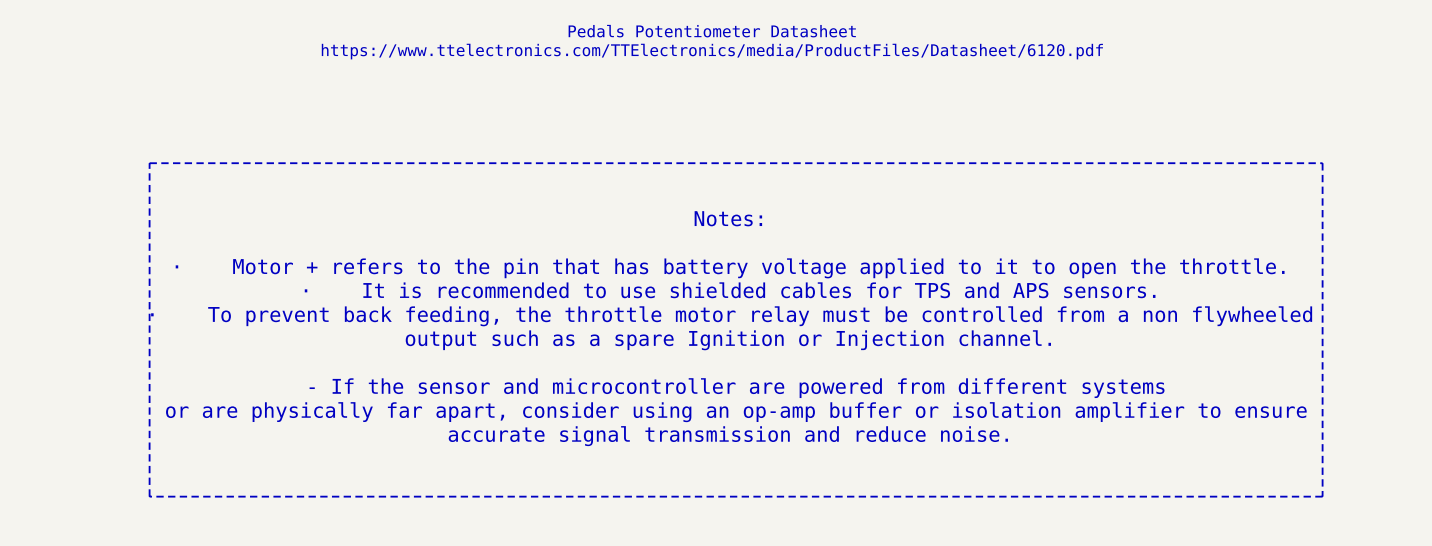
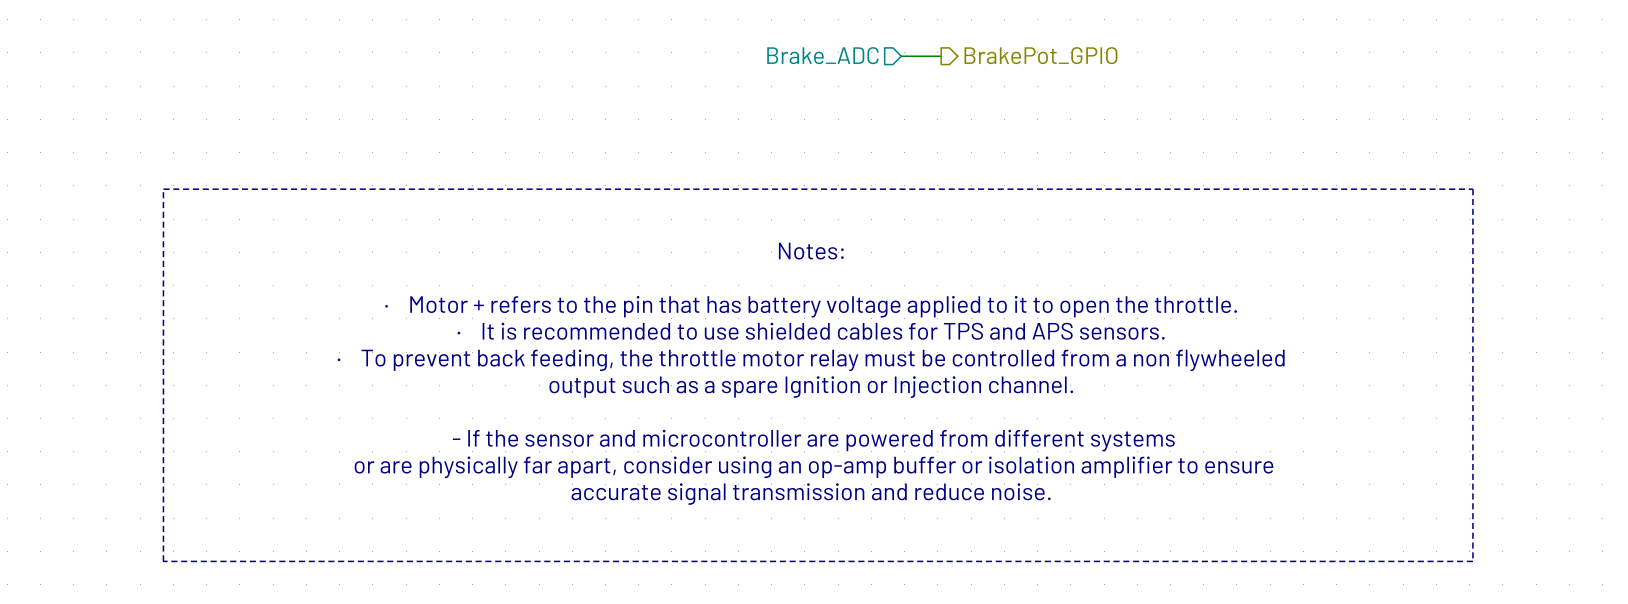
text: Pedals Potentiometer Datasheet (712, 31) -> none
wire: none -> (901, 56) (941, 56)
sheet pin: none -> Brake_ADC (822, 55)
hierarchical label: none -> BrakePot_GPIO (1040, 55)
text: https://www.ttelectronics.com/TTElectronics/media/ProductFiles/Datasheet/6120.pdf (712, 51) -> none

